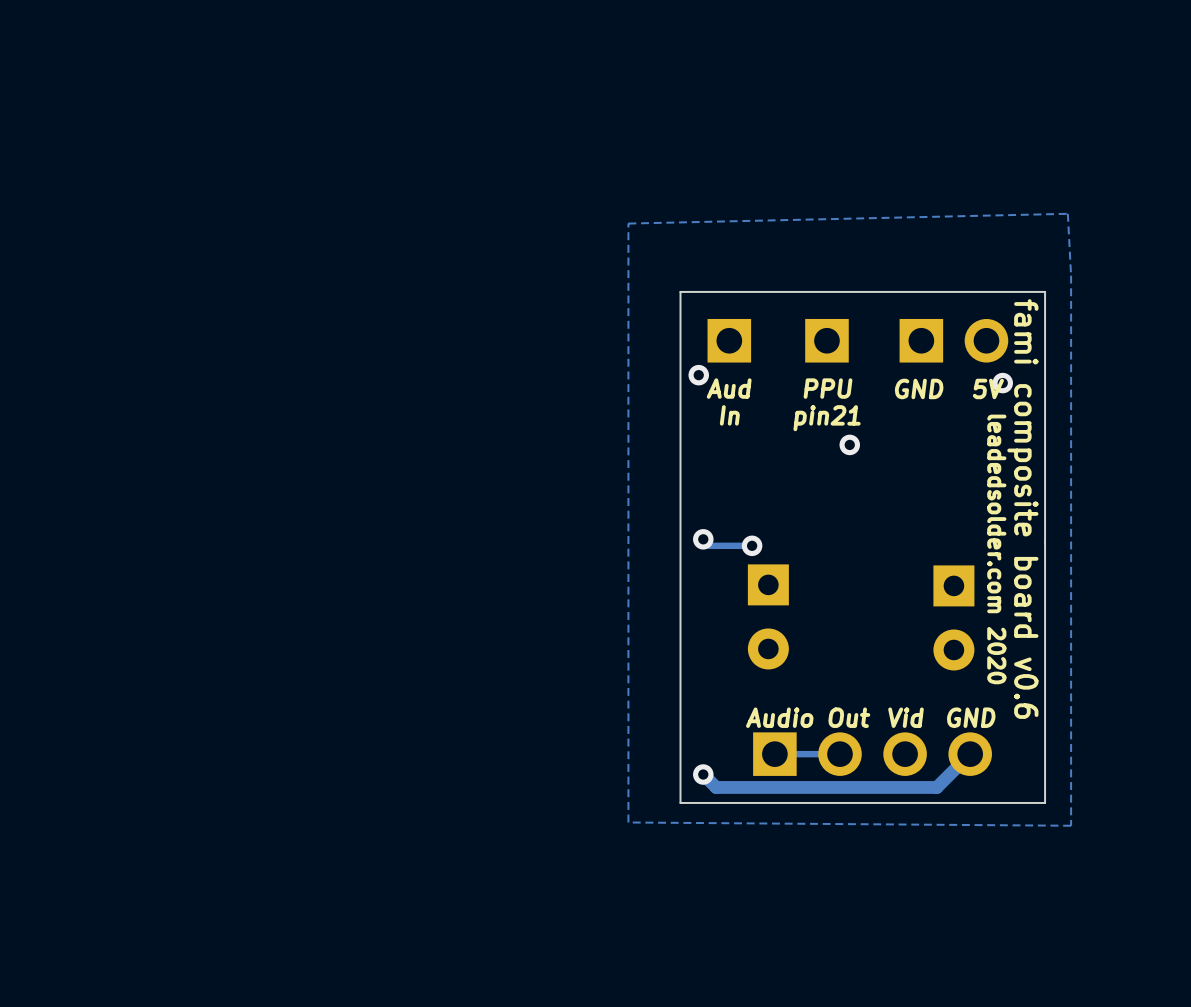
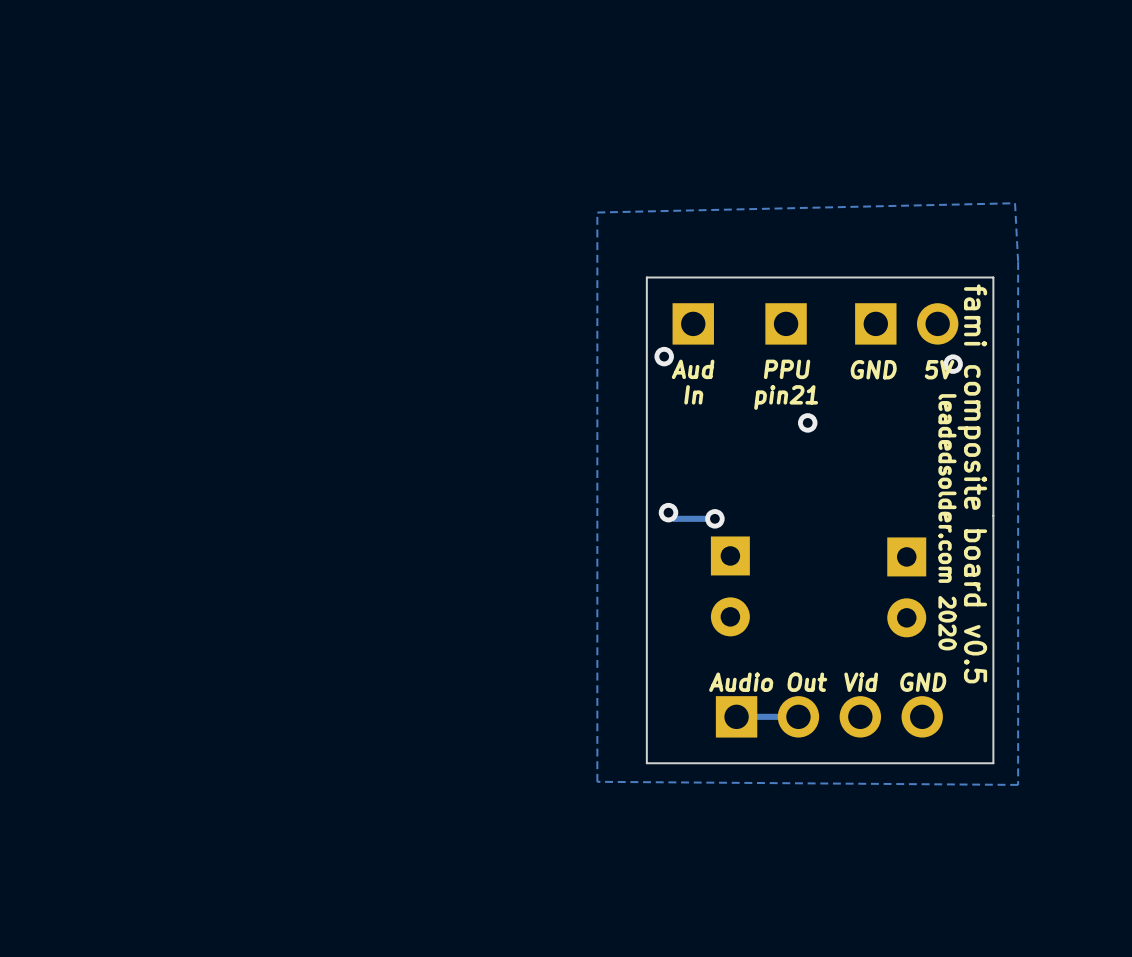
text: fami composite board v0.6 (1022, 509) -> fami composite board v0.5 (972, 483)
track: (970, 754) (936, 787) (716, 787) (703, 774) -> none
via: (703, 774) -> none

